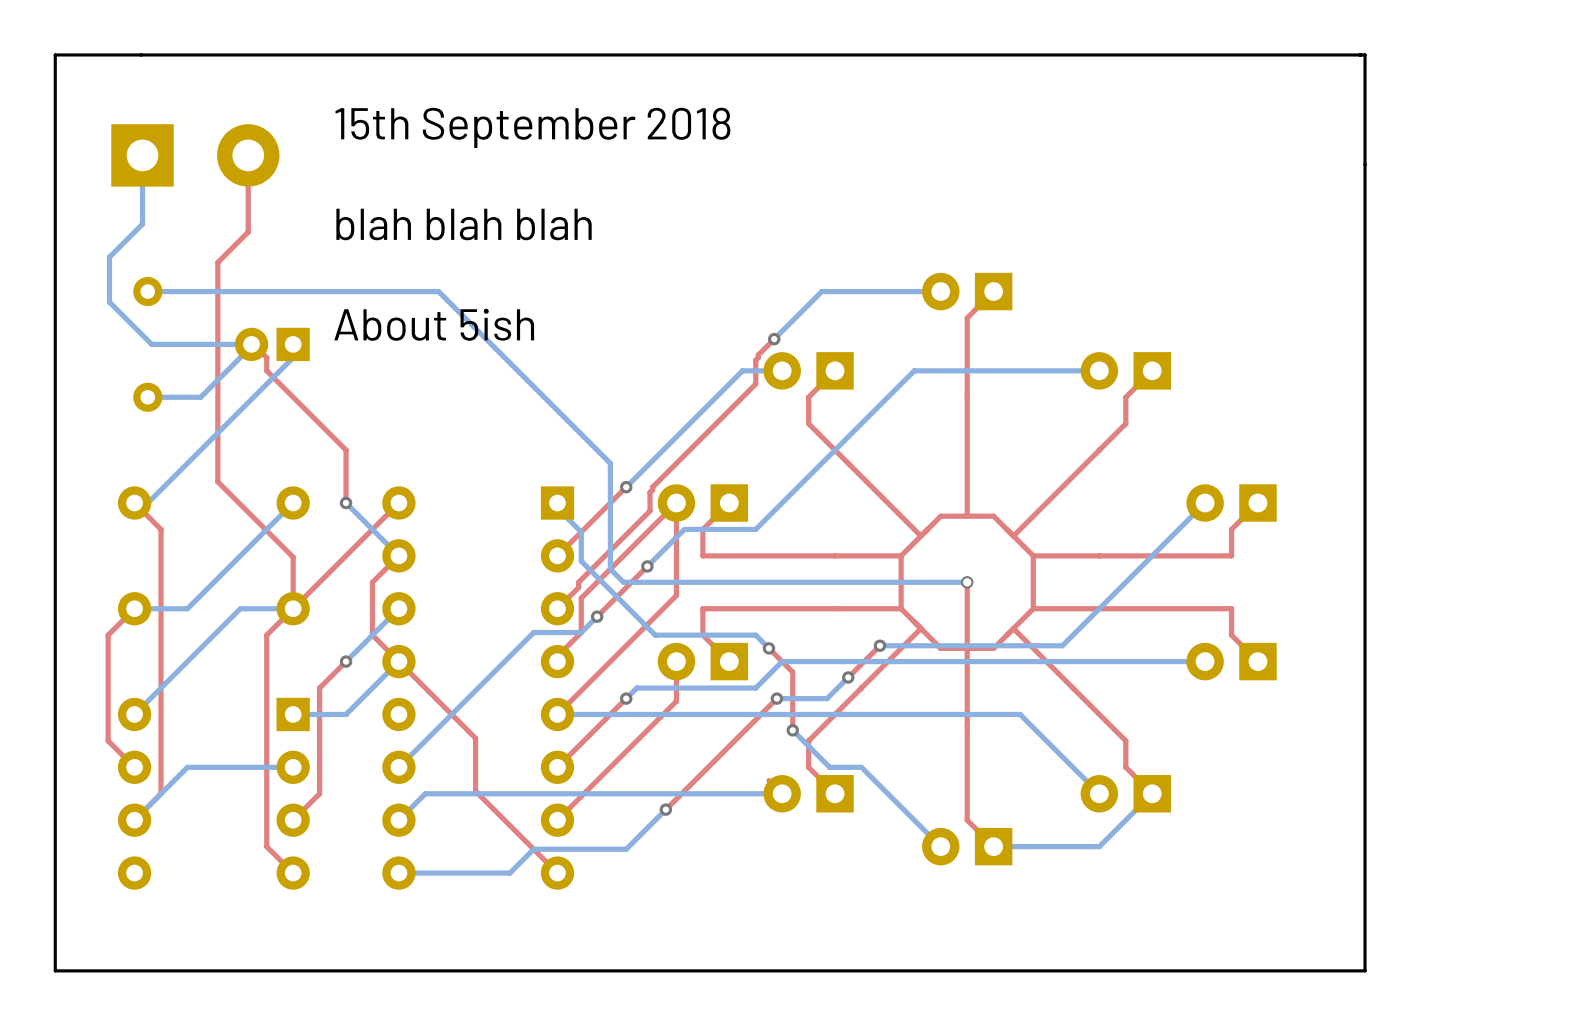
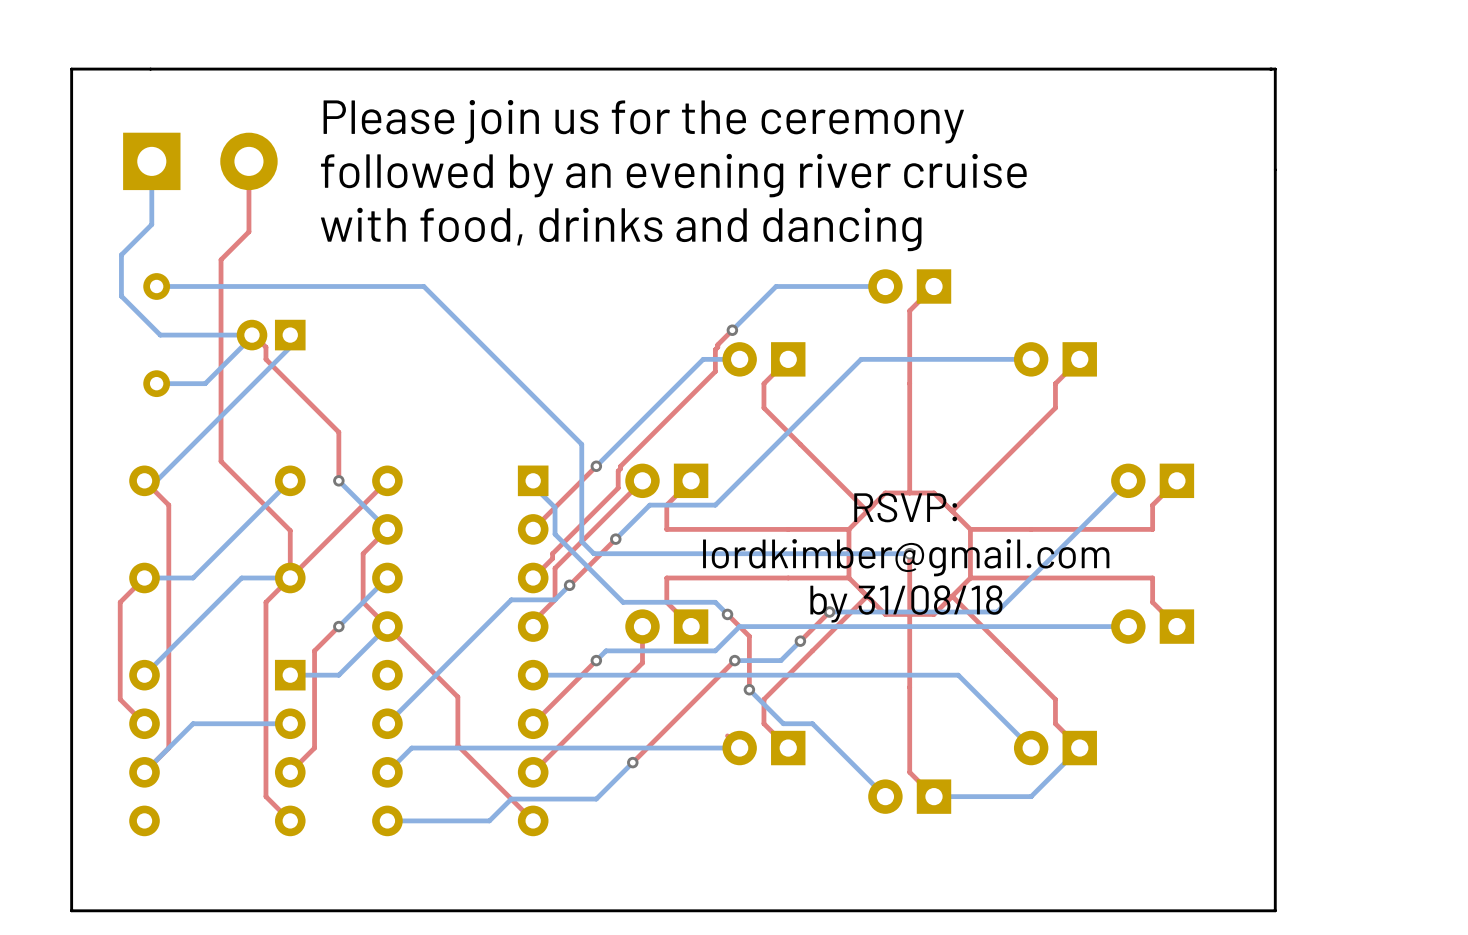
text: 15th September 2018 (532, 127) -> Please join us for the ceremony (643, 121)
text: none -> followed by an evening river cruise (673, 175)
text: blah blah blah (464, 224) -> with food, drinks and dancing (621, 229)
text: About 5ish (434, 324) -> none
top track: (676, 503) (676, 595) (557, 714) -> none
text: none -> RSVP: (905, 507)
text: none -> lordkimber@gmail.com (906, 557)
text: none -> by 31/08/18 (906, 603)

